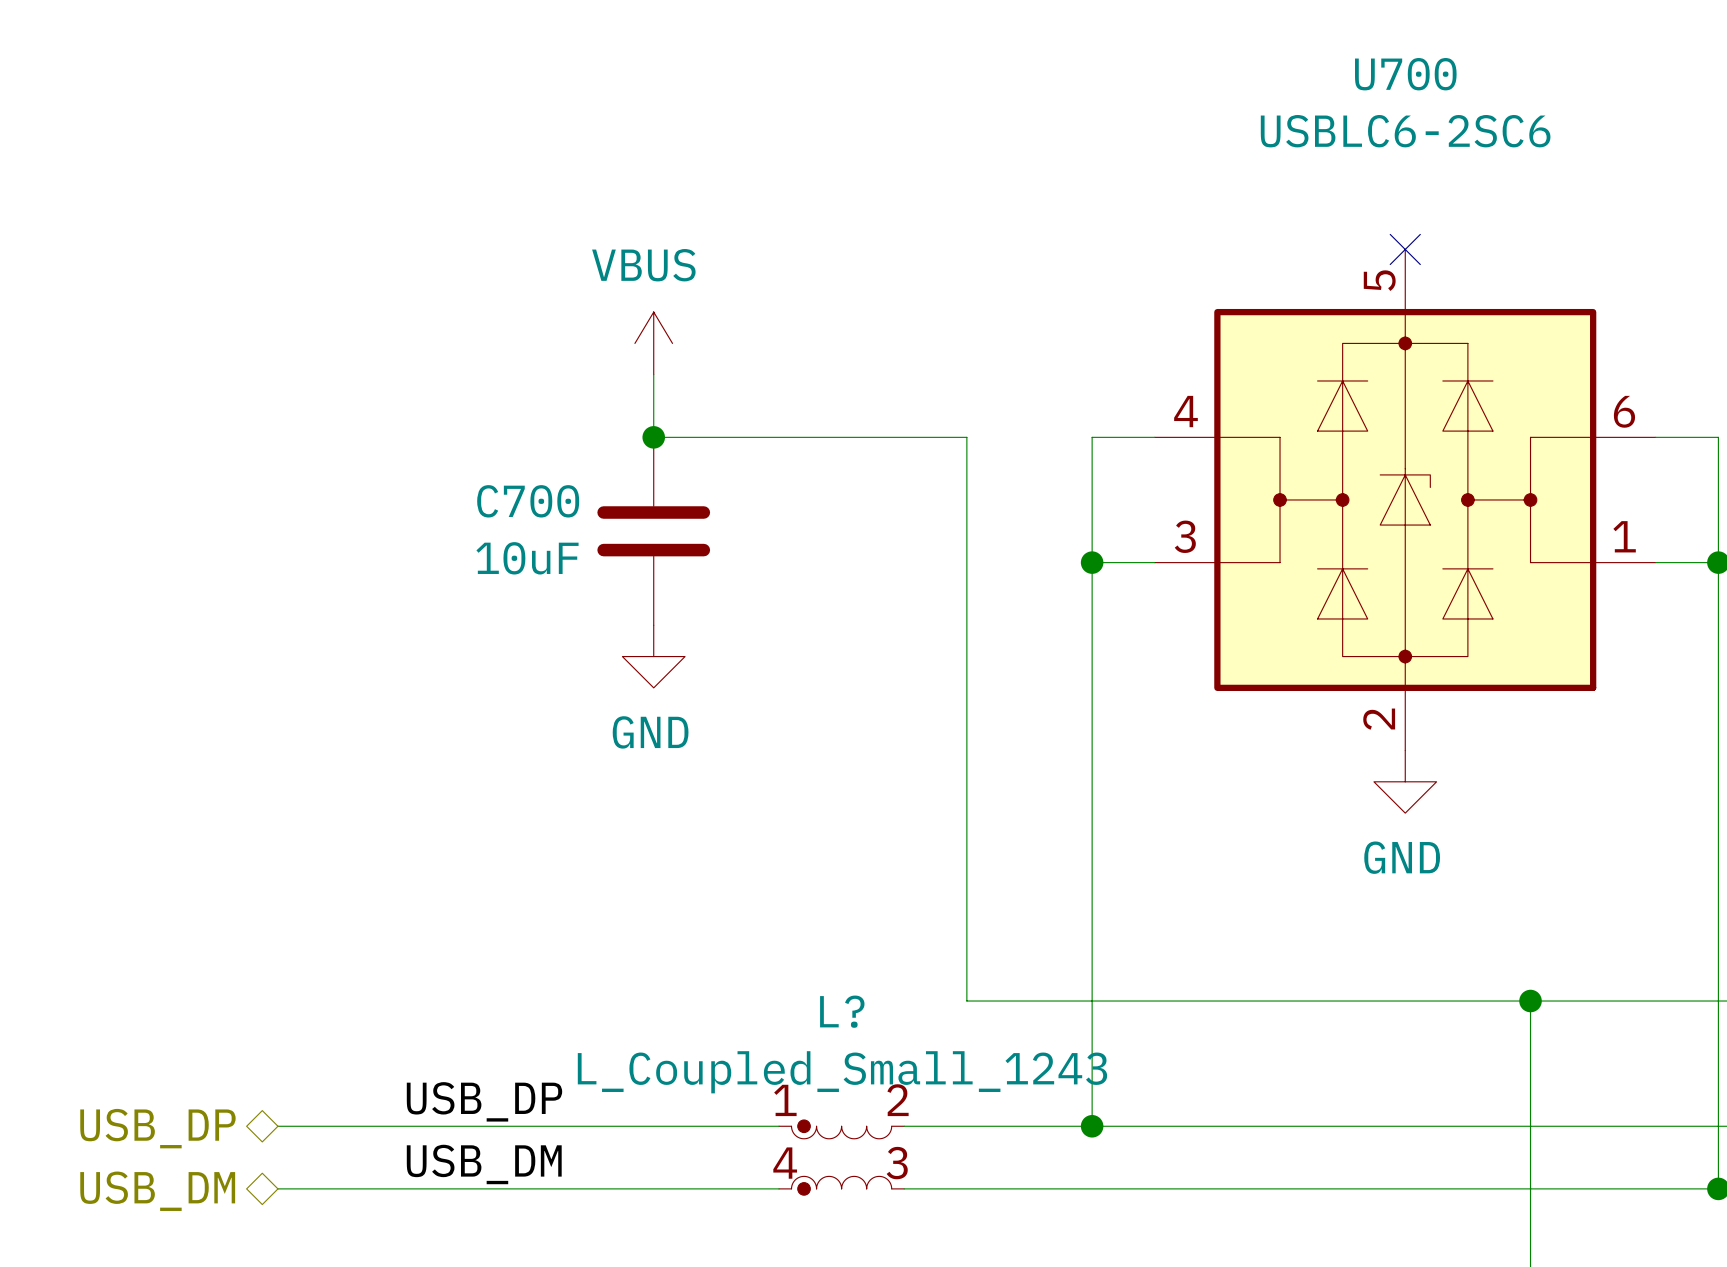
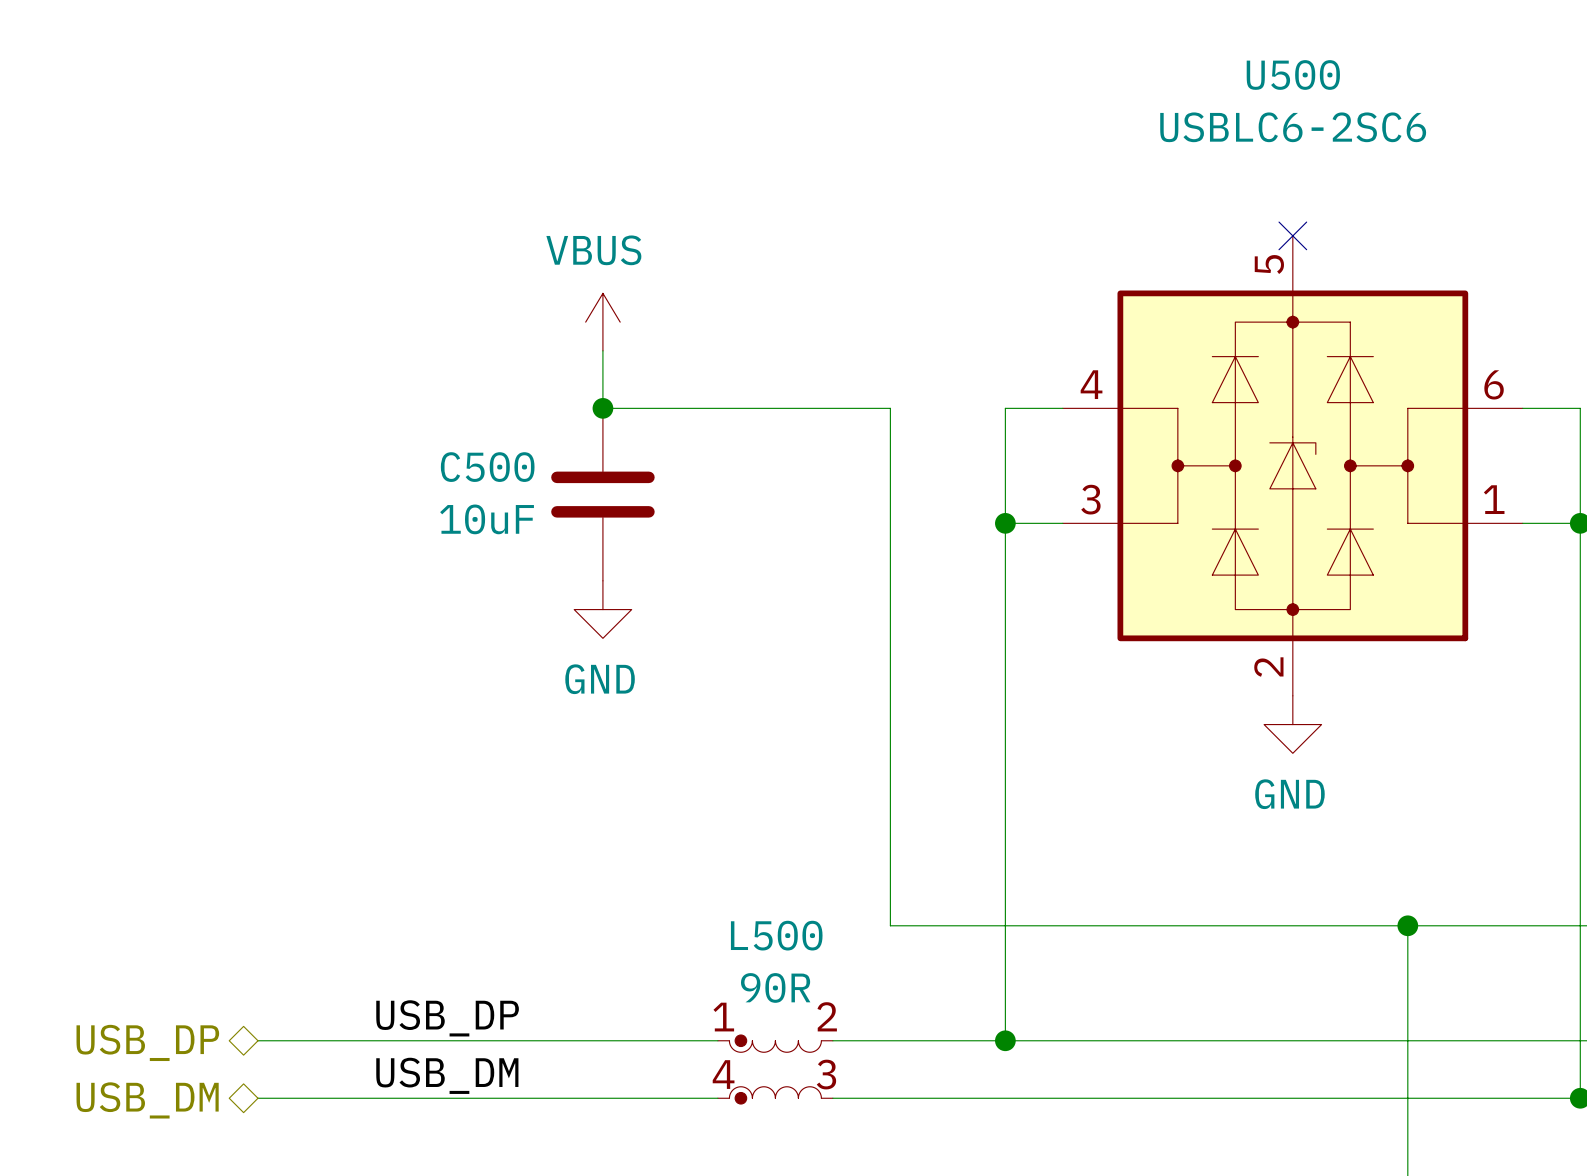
U700 name: U700 (1405, 74) -> U500 (1293, 74)
C700 name: C700 (528, 501) -> C500 (487, 467)
L? name: L? (842, 1011) -> L500 (776, 935)
L? value: L_Coupled_Small_1243 (842, 1072) -> 90R (775, 987)

